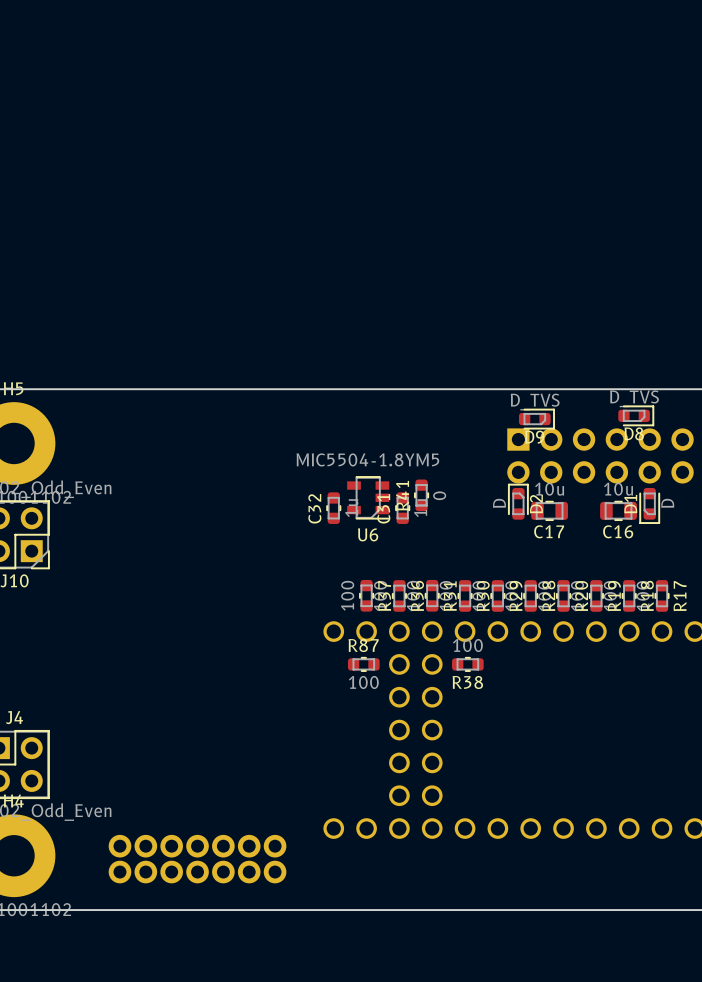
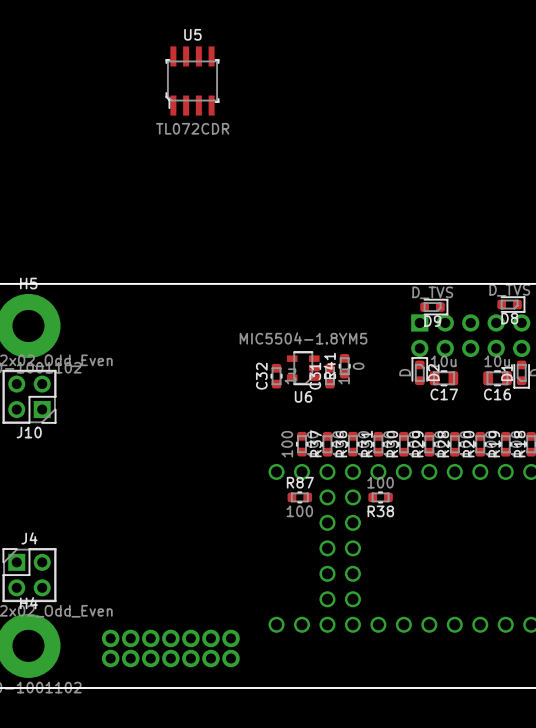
U5: none -> TL072CDR (192, 80)

